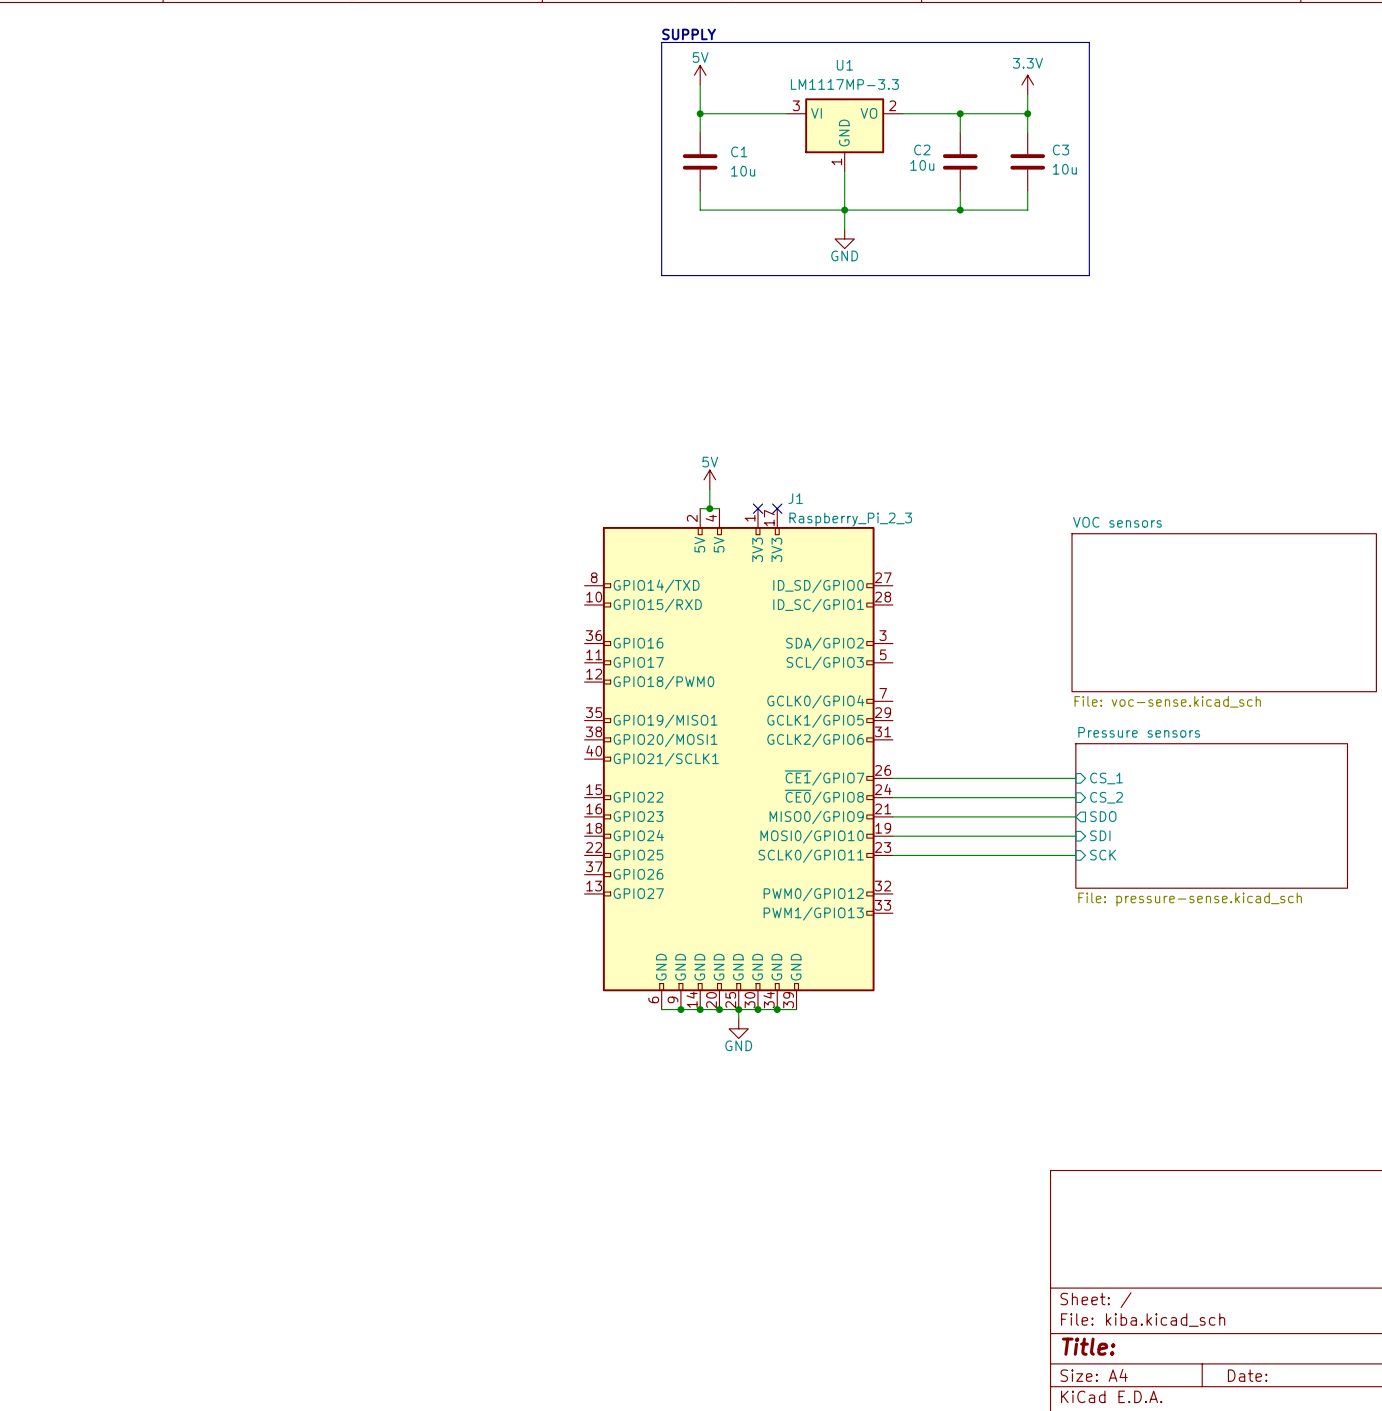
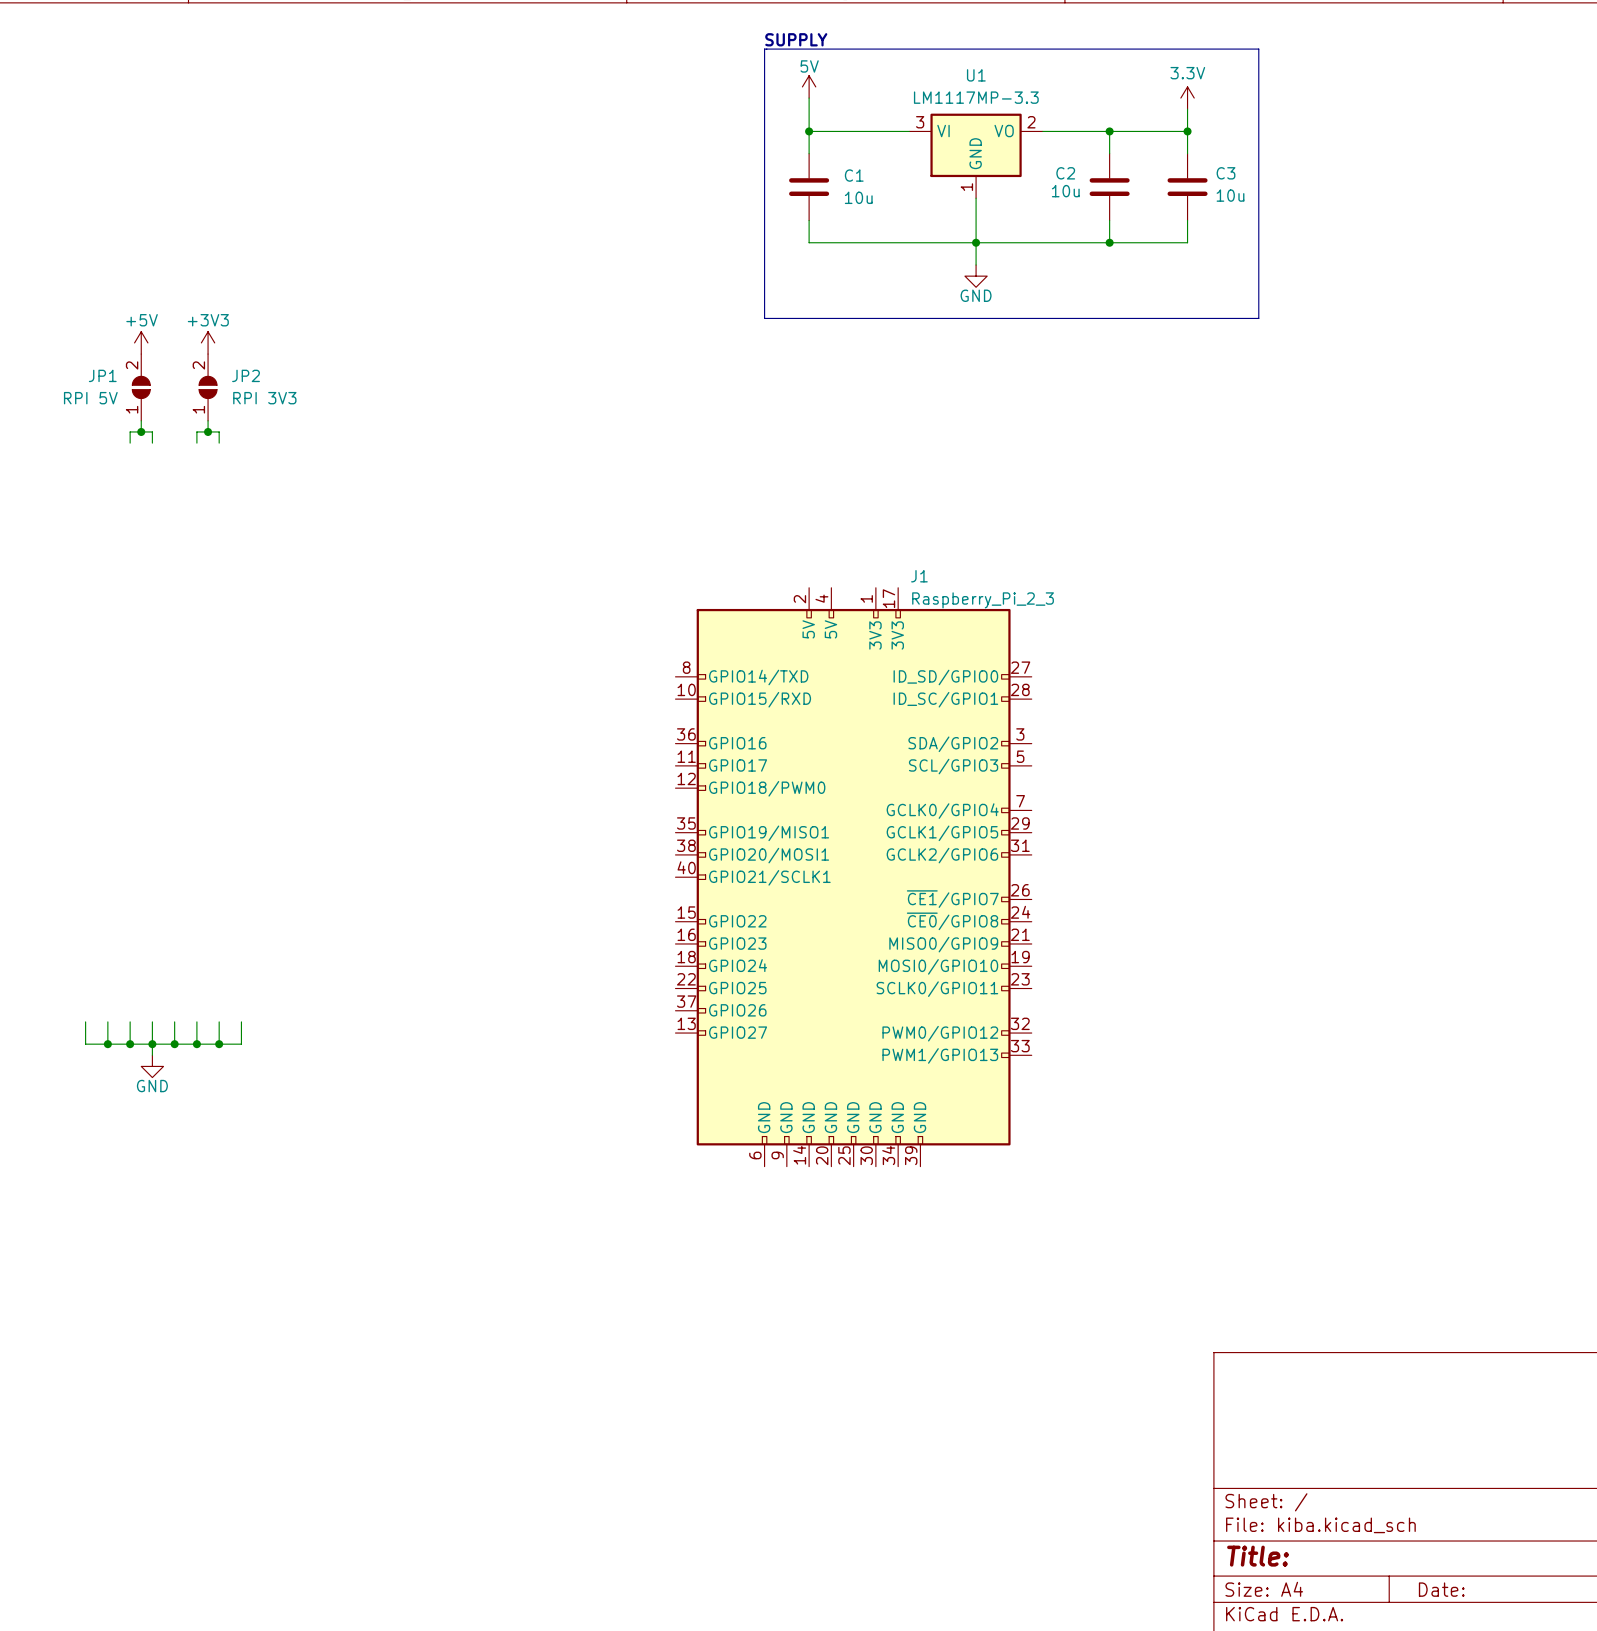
power symbol: none -> +5V (141, 342)
power symbol: none -> +3V3 (208, 342)
JP1: none -> RPI 5V (141, 387)
JP2: none -> RPI 3V3 (208, 387)
wire: none -> (141, 420) (141, 431)
wire: none -> (208, 420) (208, 431)
junction: none -> (141, 431)
junction: none -> (208, 431)
wire: none -> (130, 443) (130, 431) (152, 431) (152, 443)
wire: none -> (196, 443) (196, 431) (219, 431) (219, 443)
power symbol: 5V (709, 479) -> none
wire: (709, 489) (709, 508) -> none
wire: (700, 508) (719, 508) -> none
junction: (709, 508) -> none
no-connect mark: (757, 508) -> none
no-connect mark: (777, 508) -> none
sheet VOC sensors: File: voc-sense.kicad_sch (1224, 612) -> none
wire: (892, 778) (1075, 778) -> none
sheet pin: CS_1 (1106, 778) -> none
wire: (892, 797) (1075, 797) -> none
sheet pin: CS_2 (1106, 797) -> none
sheet Pressure sensors: File: pressure-sense.kicad_sch (1211, 815) -> none
wire: (892, 816) (1075, 816) -> none
sheet pin: SDO (1103, 816) -> none
sheet pin: SDI (1100, 835) -> none
wire: (892, 836) (1075, 836) -> none
wire: (892, 855) (1075, 855) -> none
sheet pin: SCK (1103, 855) -> none
wire: none -> (85, 1021) (85, 1044) (241, 1044) (241, 1021)
wire: none -> (107, 1021) (107, 1044)
wire: none -> (130, 1021) (130, 1044)
wire: none -> (152, 1021) (152, 1055)
wire: none -> (174, 1021) (174, 1044)
wire: none -> (196, 1021) (196, 1044)
wire: none -> (219, 1021) (219, 1044)
junction: none -> (107, 1044)
junction: none -> (130, 1044)
junction: none -> (152, 1044)
junction: none -> (174, 1044)
junction: none -> (196, 1044)
junction: none -> (219, 1044)
power symbol: none -> GND (152, 1066)
wire: (661, 1009) (796, 1009) -> none
junction: (680, 1009) -> none
junction: (700, 1009) -> none
junction: (719, 1009) -> none
wire: (738, 1009) (738, 1019) -> none
junction: (738, 1009) -> none
junction: (757, 1009) -> none
junction: (777, 1009) -> none
power symbol: GND (738, 1028) -> none

